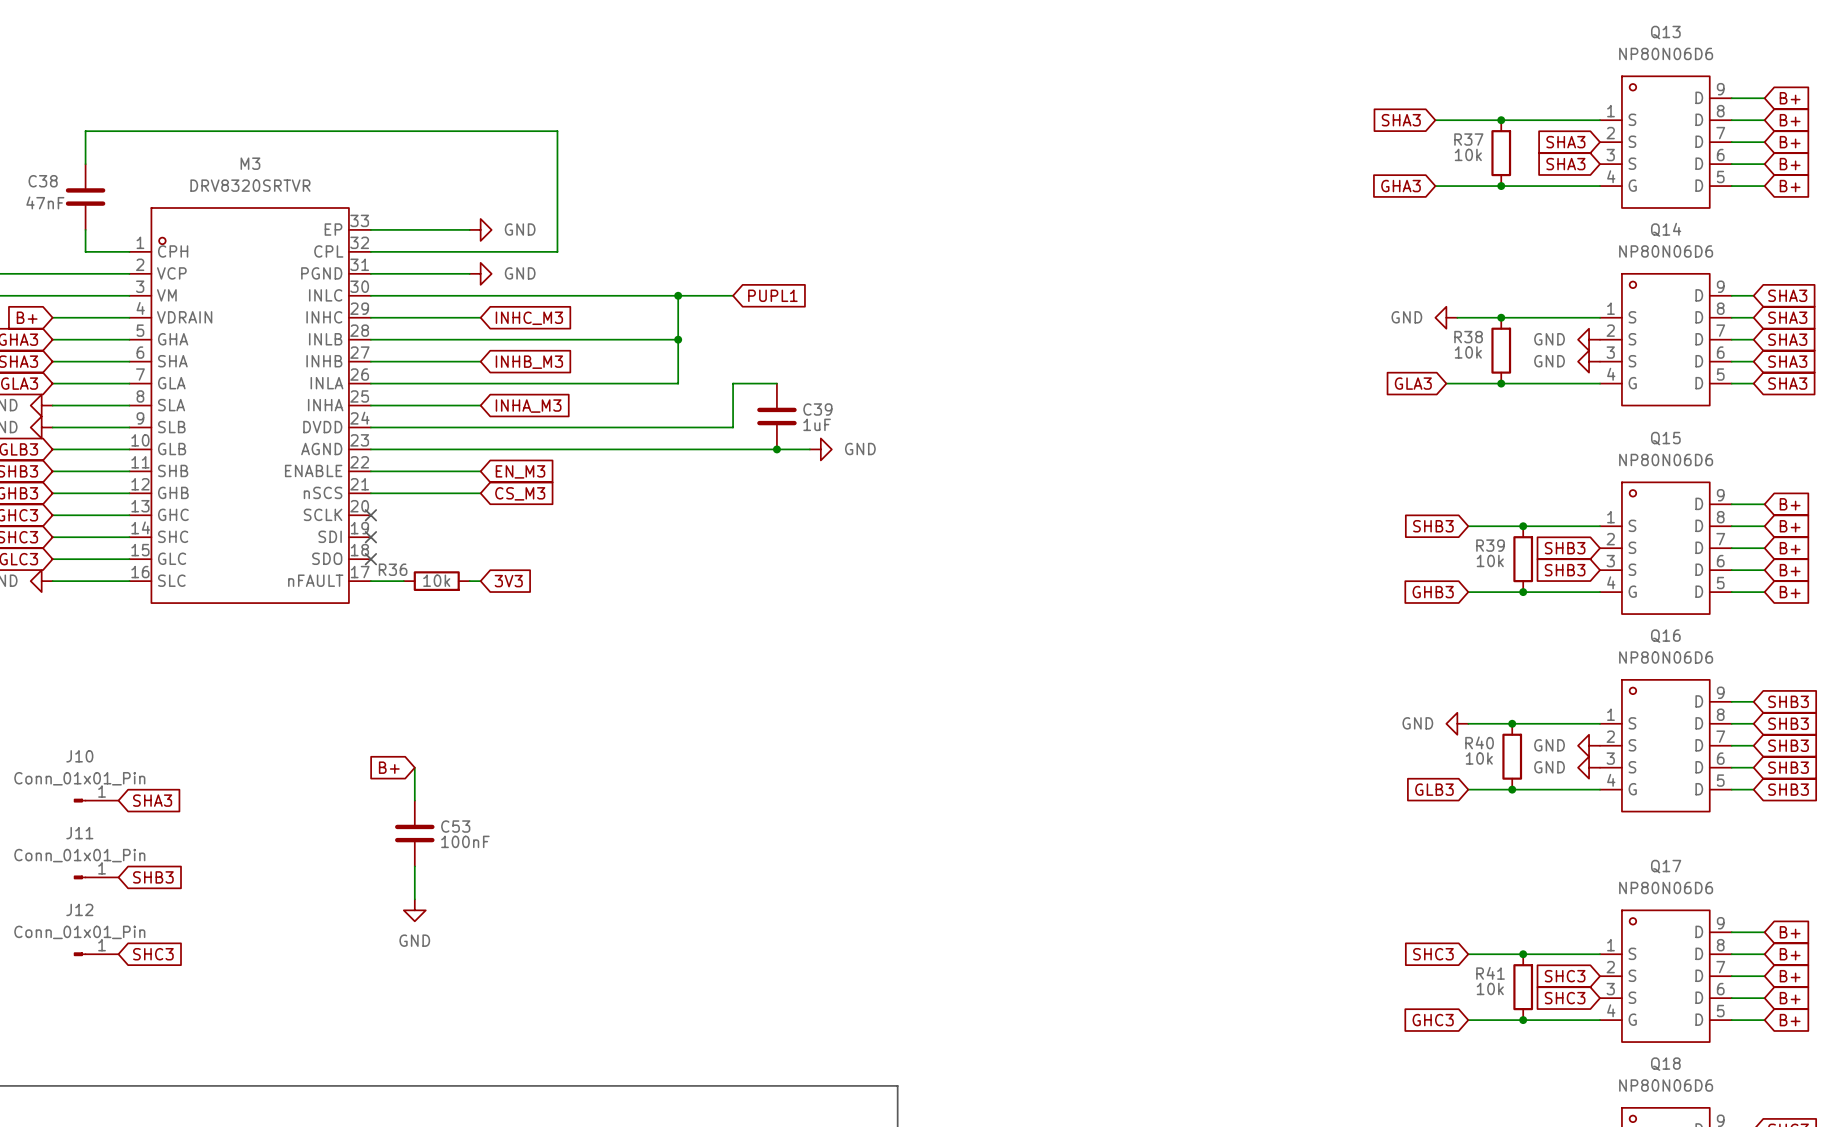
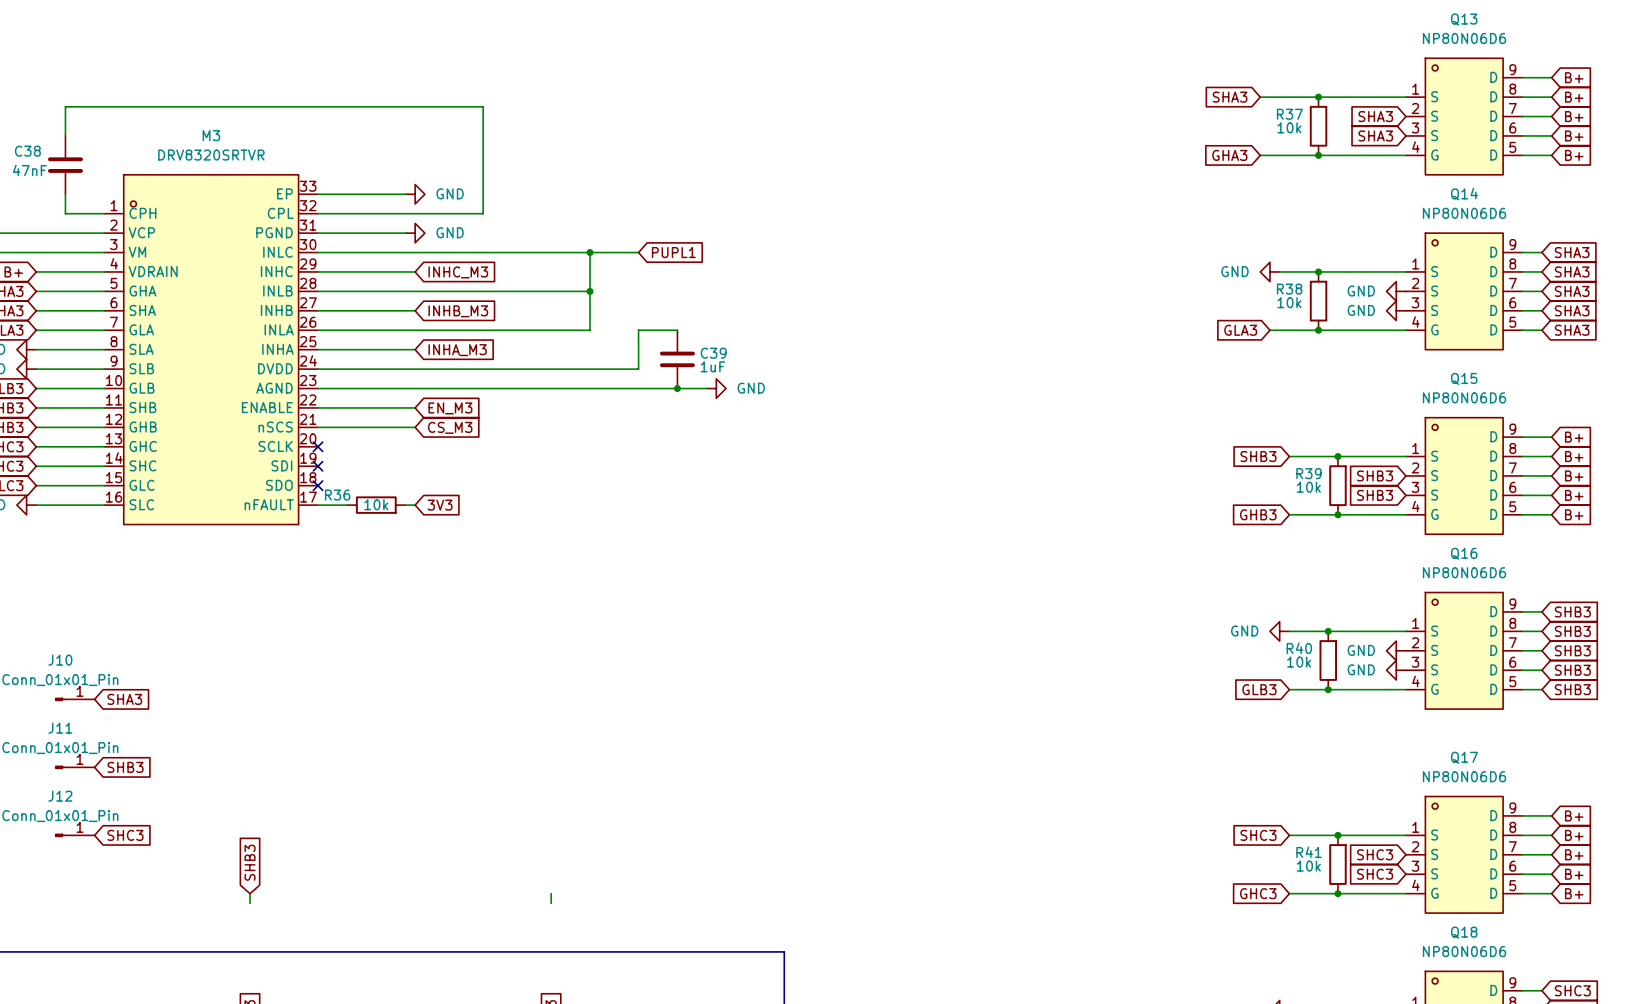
global label: B+ (389, 767) -> none
wire: (414, 767) (414, 800) -> none
C53: 100nF (414, 833) -> none
wire: (414, 866) (414, 899) -> none
power symbol: GND (414, 910) -> none
global label: none -> SHB3 (250, 862)
wire: none -> (250, 893) (250, 903)
wire: none -> (551, 893) (551, 903)

